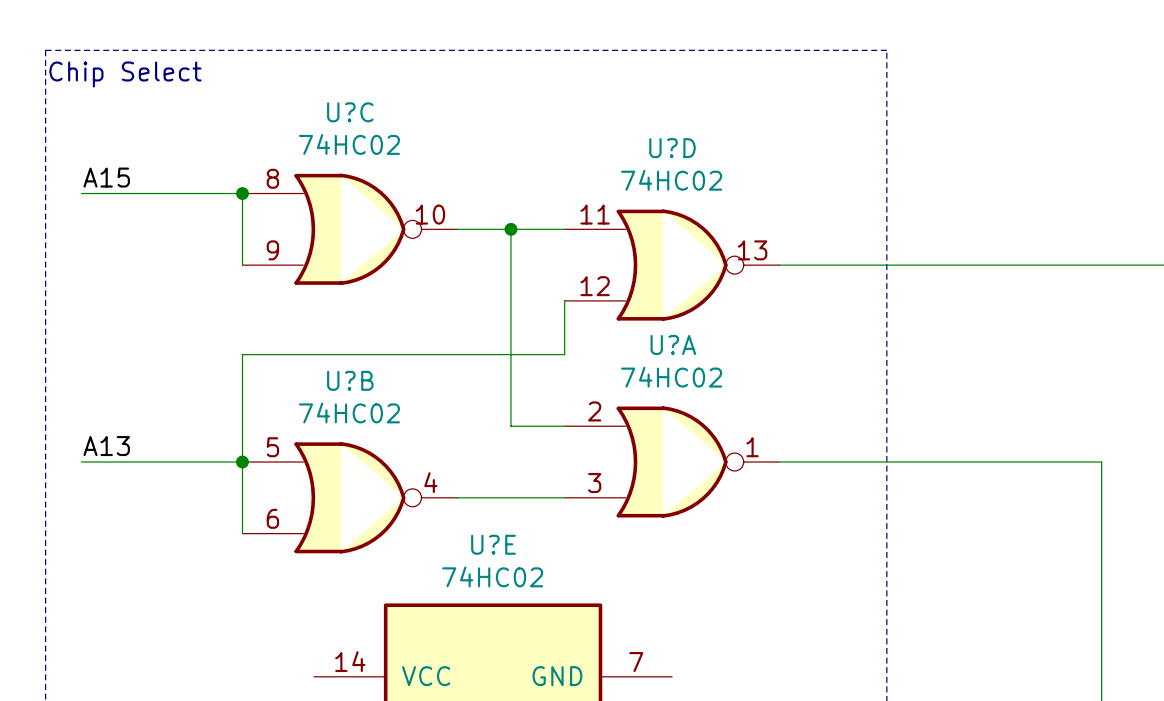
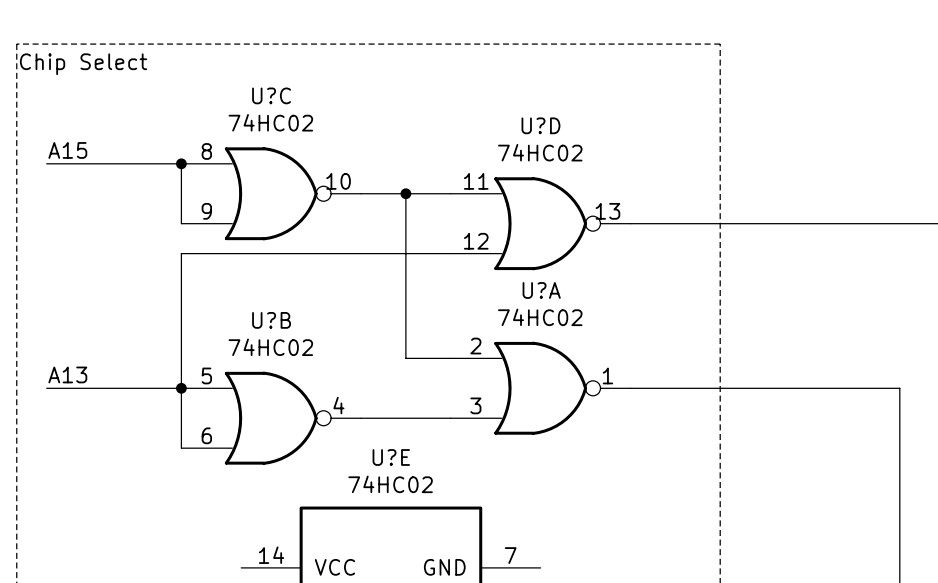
wire: (564, 300) (564, 354) (242, 354) -> (450, 253) (181, 253) (181, 298)

